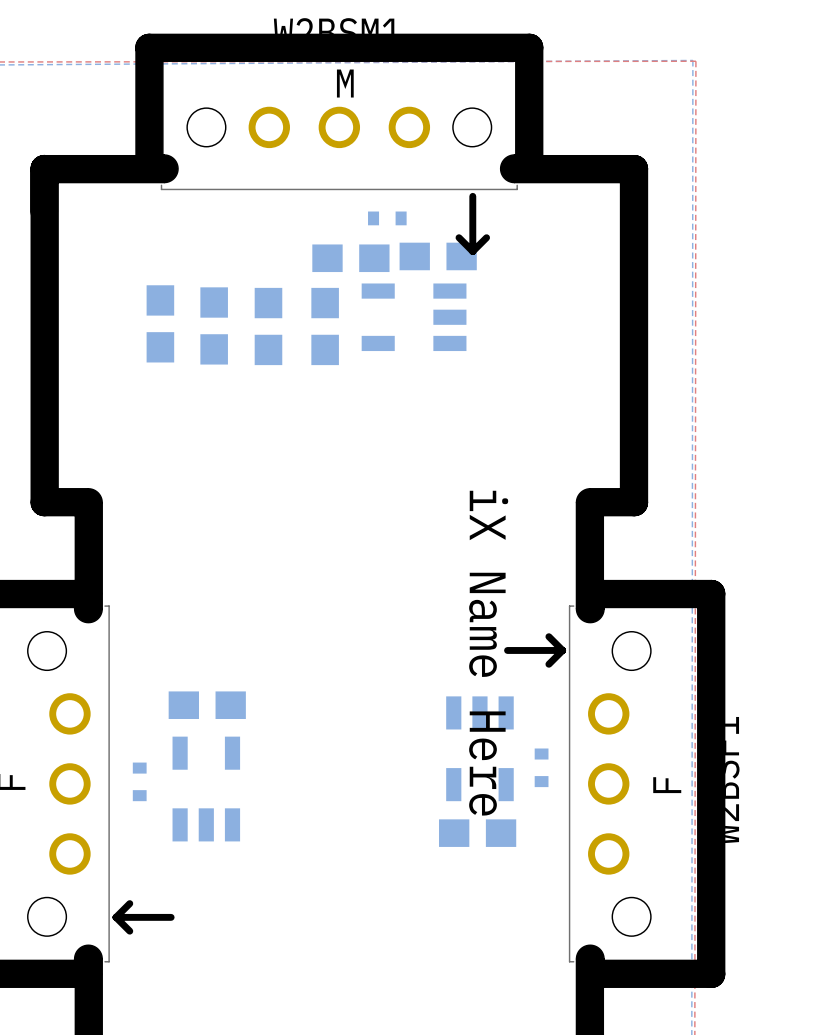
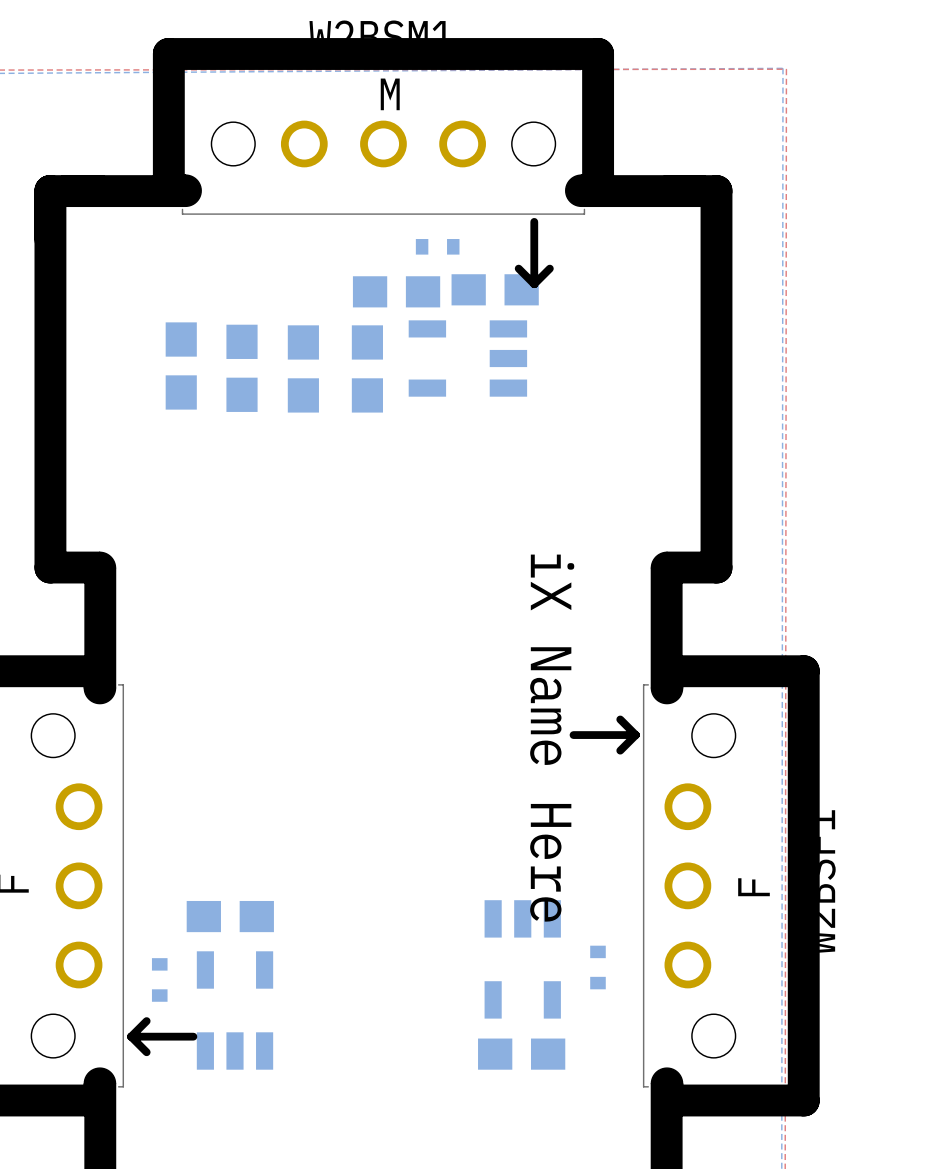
part position: (207, 705) -> (521, 1054)
part footprint: [172, 736, 241, 842] -> [186, 900, 274, 933]
part rotation: 0° (479, 748) -> 180° (234, 1010)
part position: (479, 748) -> (234, 1010)
part position: (541, 767) -> (597, 967)
part position: (139, 781) -> (159, 979)
part footprint: [439, 819, 517, 847] -> [484, 900, 561, 1019]

